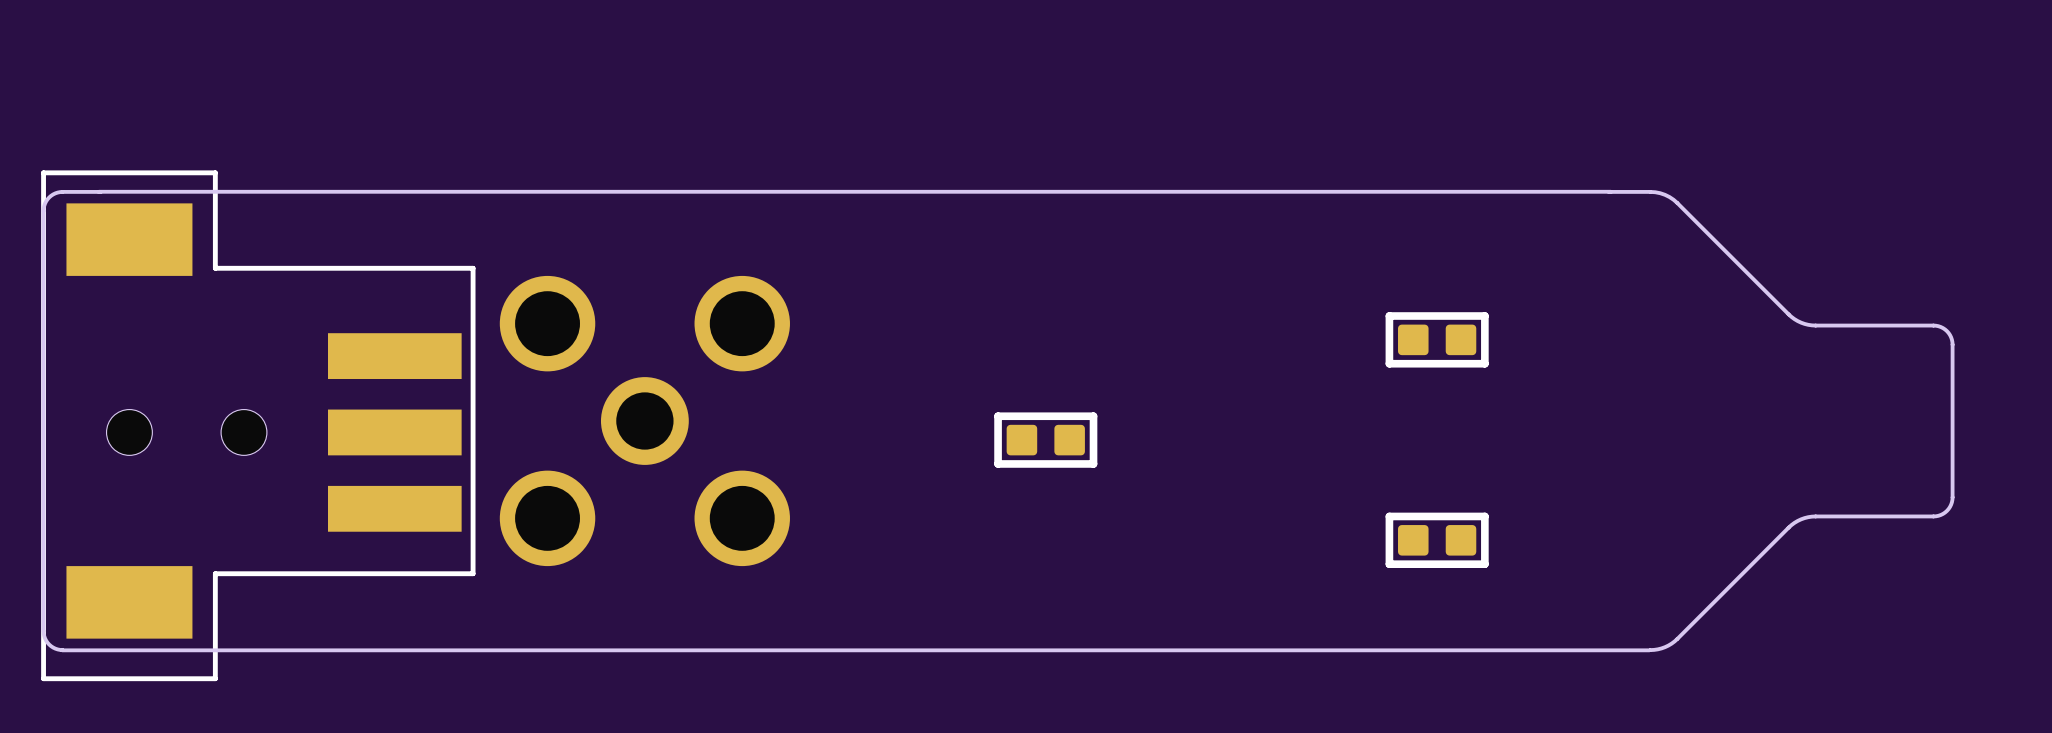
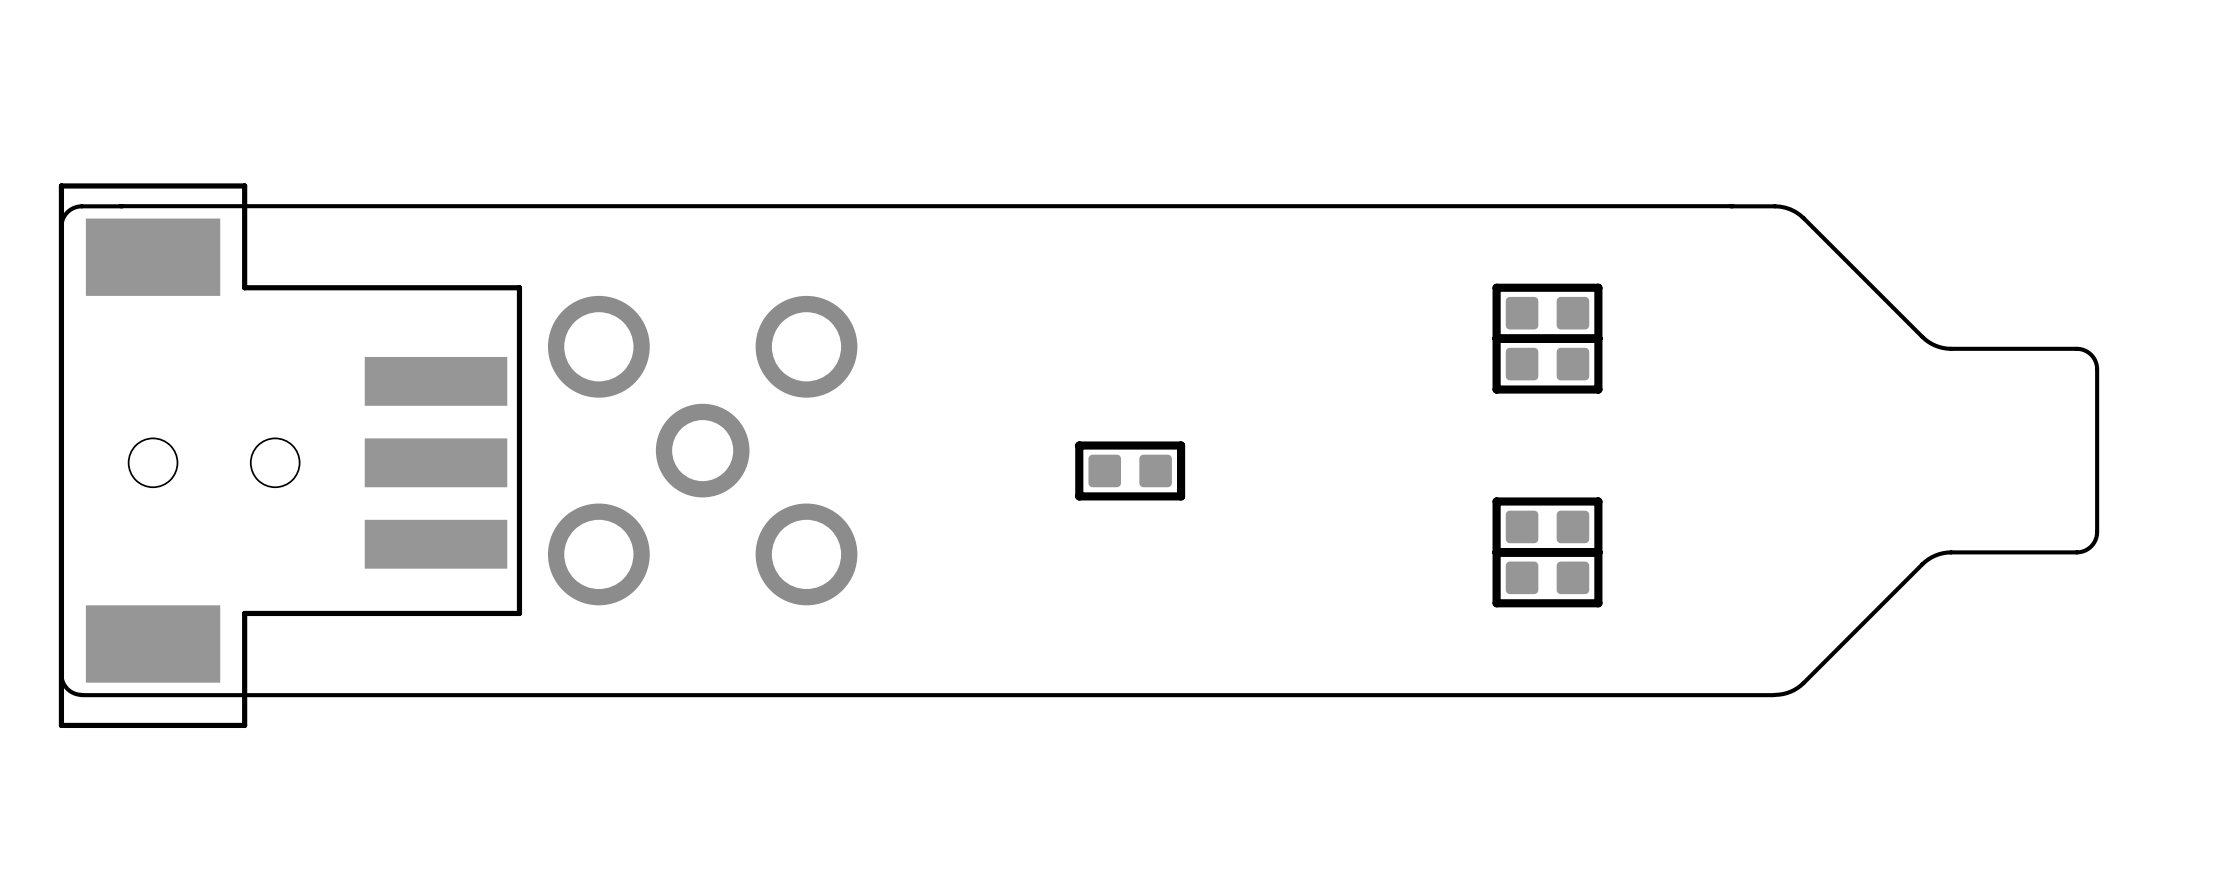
part: none -> (1547, 313)
part: none -> (1547, 526)

